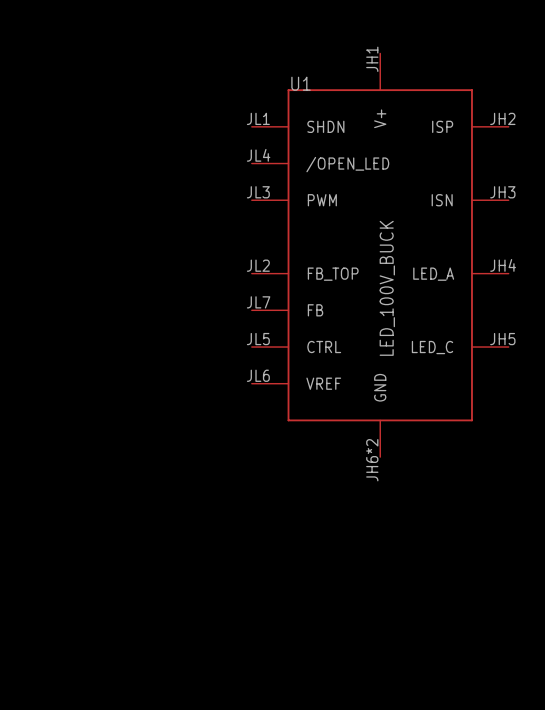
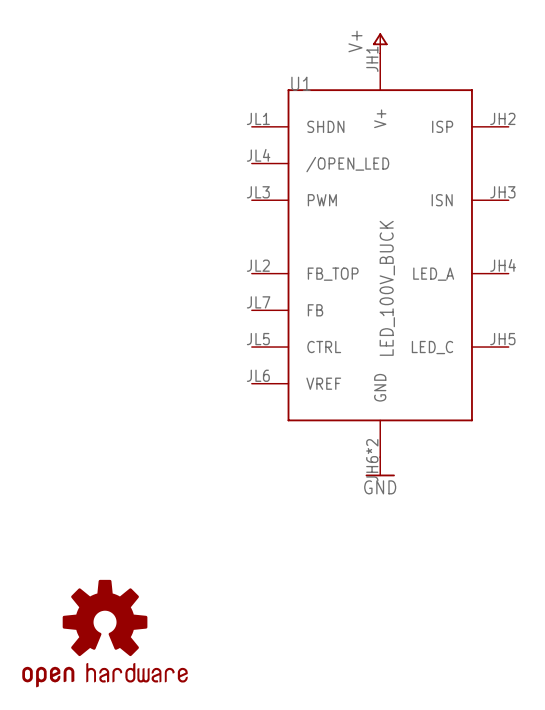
power symbol: none -> V+ (380, 43)
power symbol: none -> GND (380, 466)
part: none -> (104, 633)

